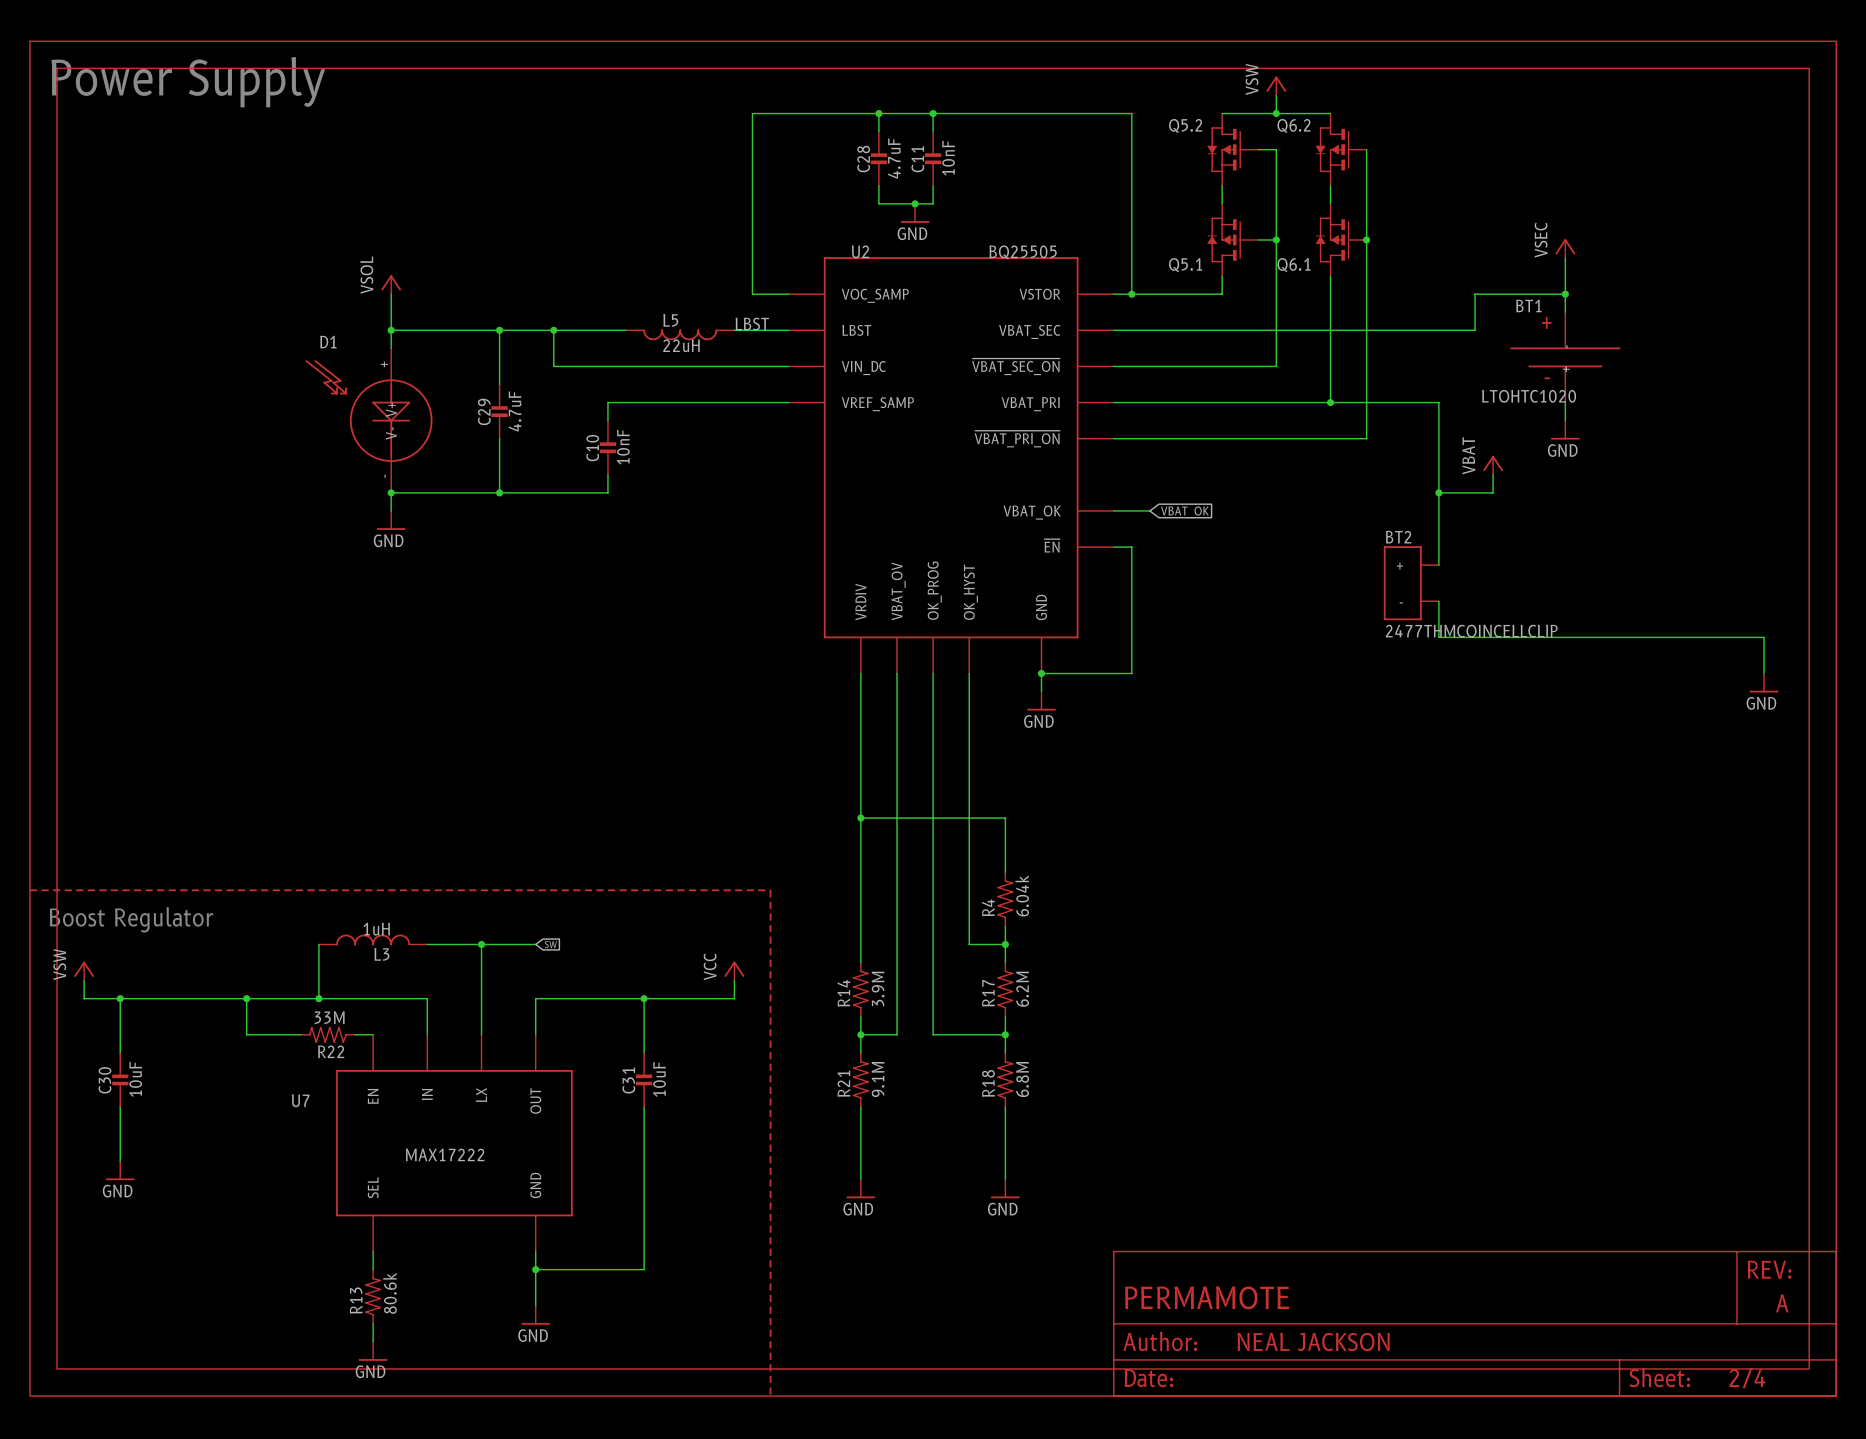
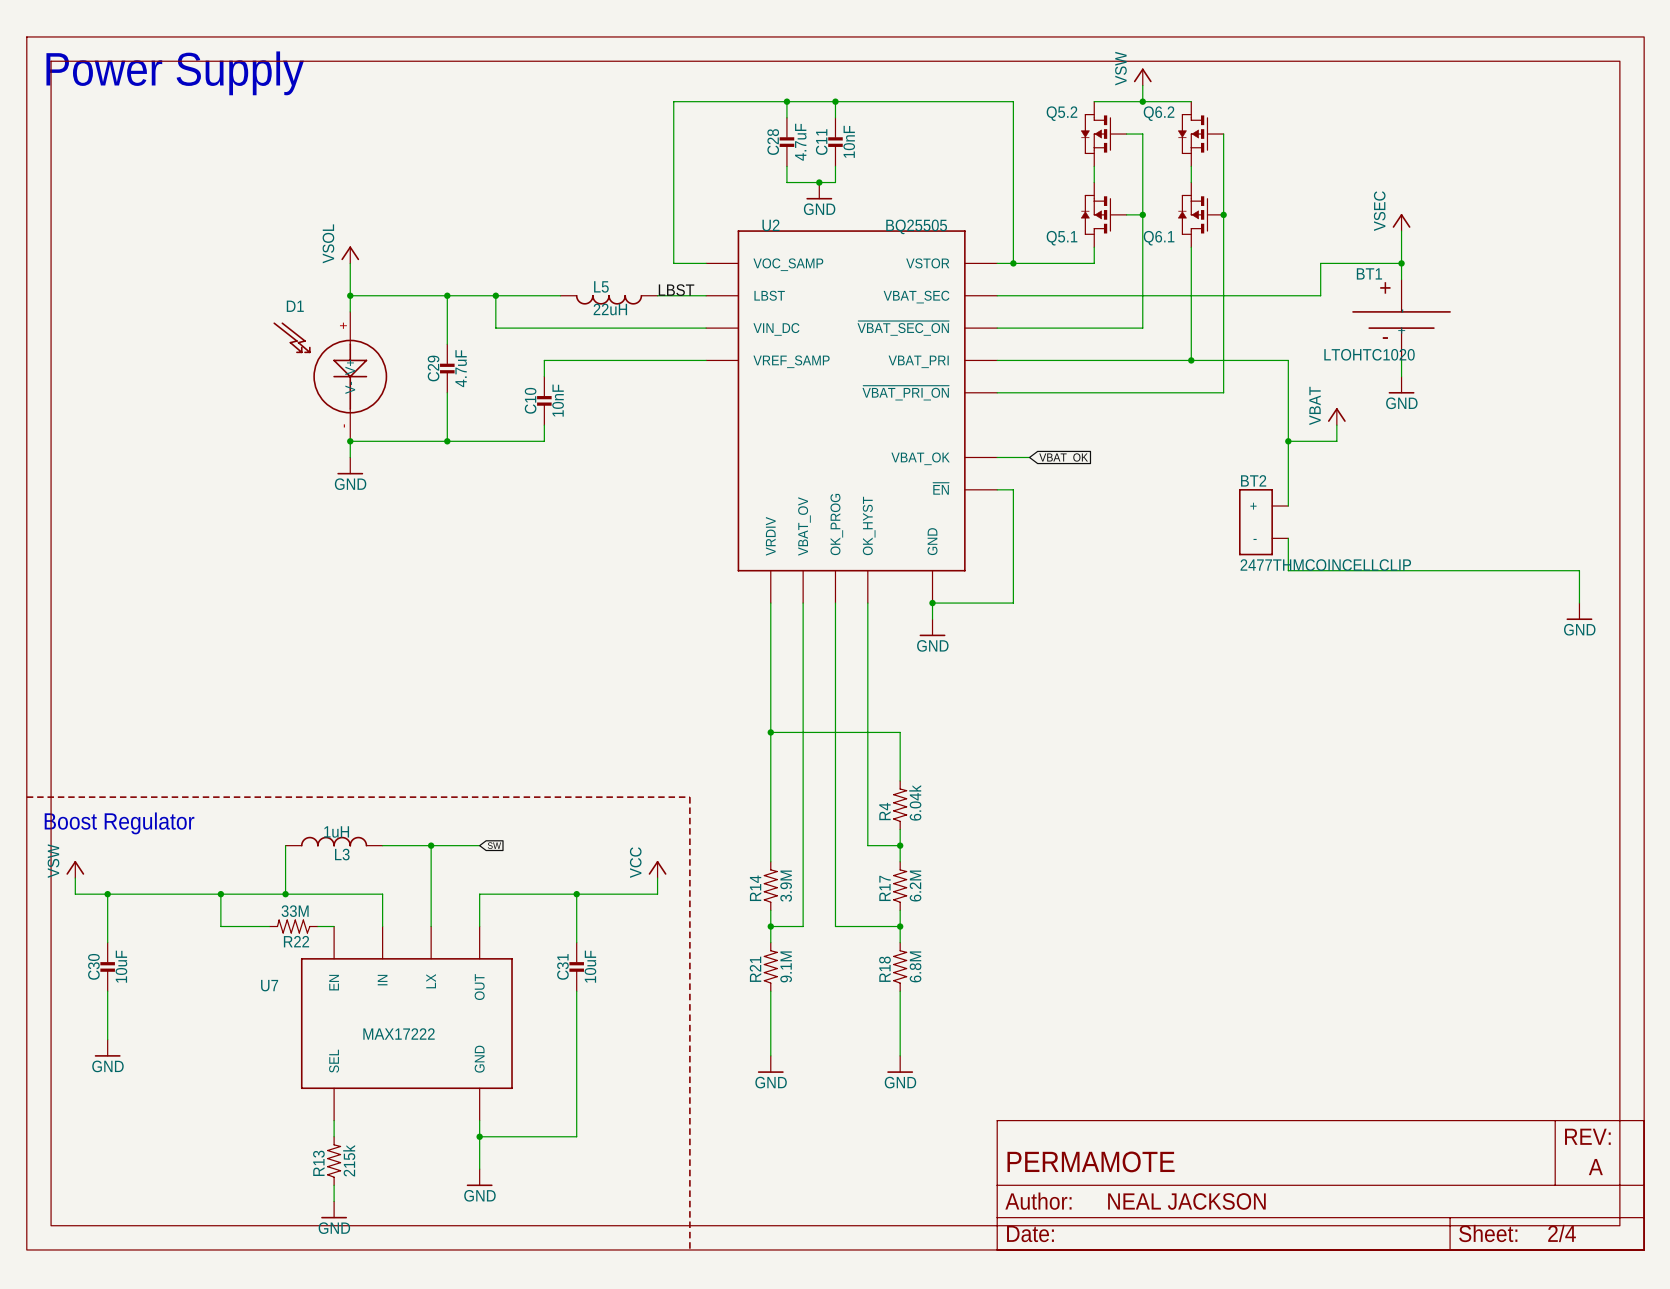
R13 value: 80.6k (389, 1293) -> 215k (349, 1160)

